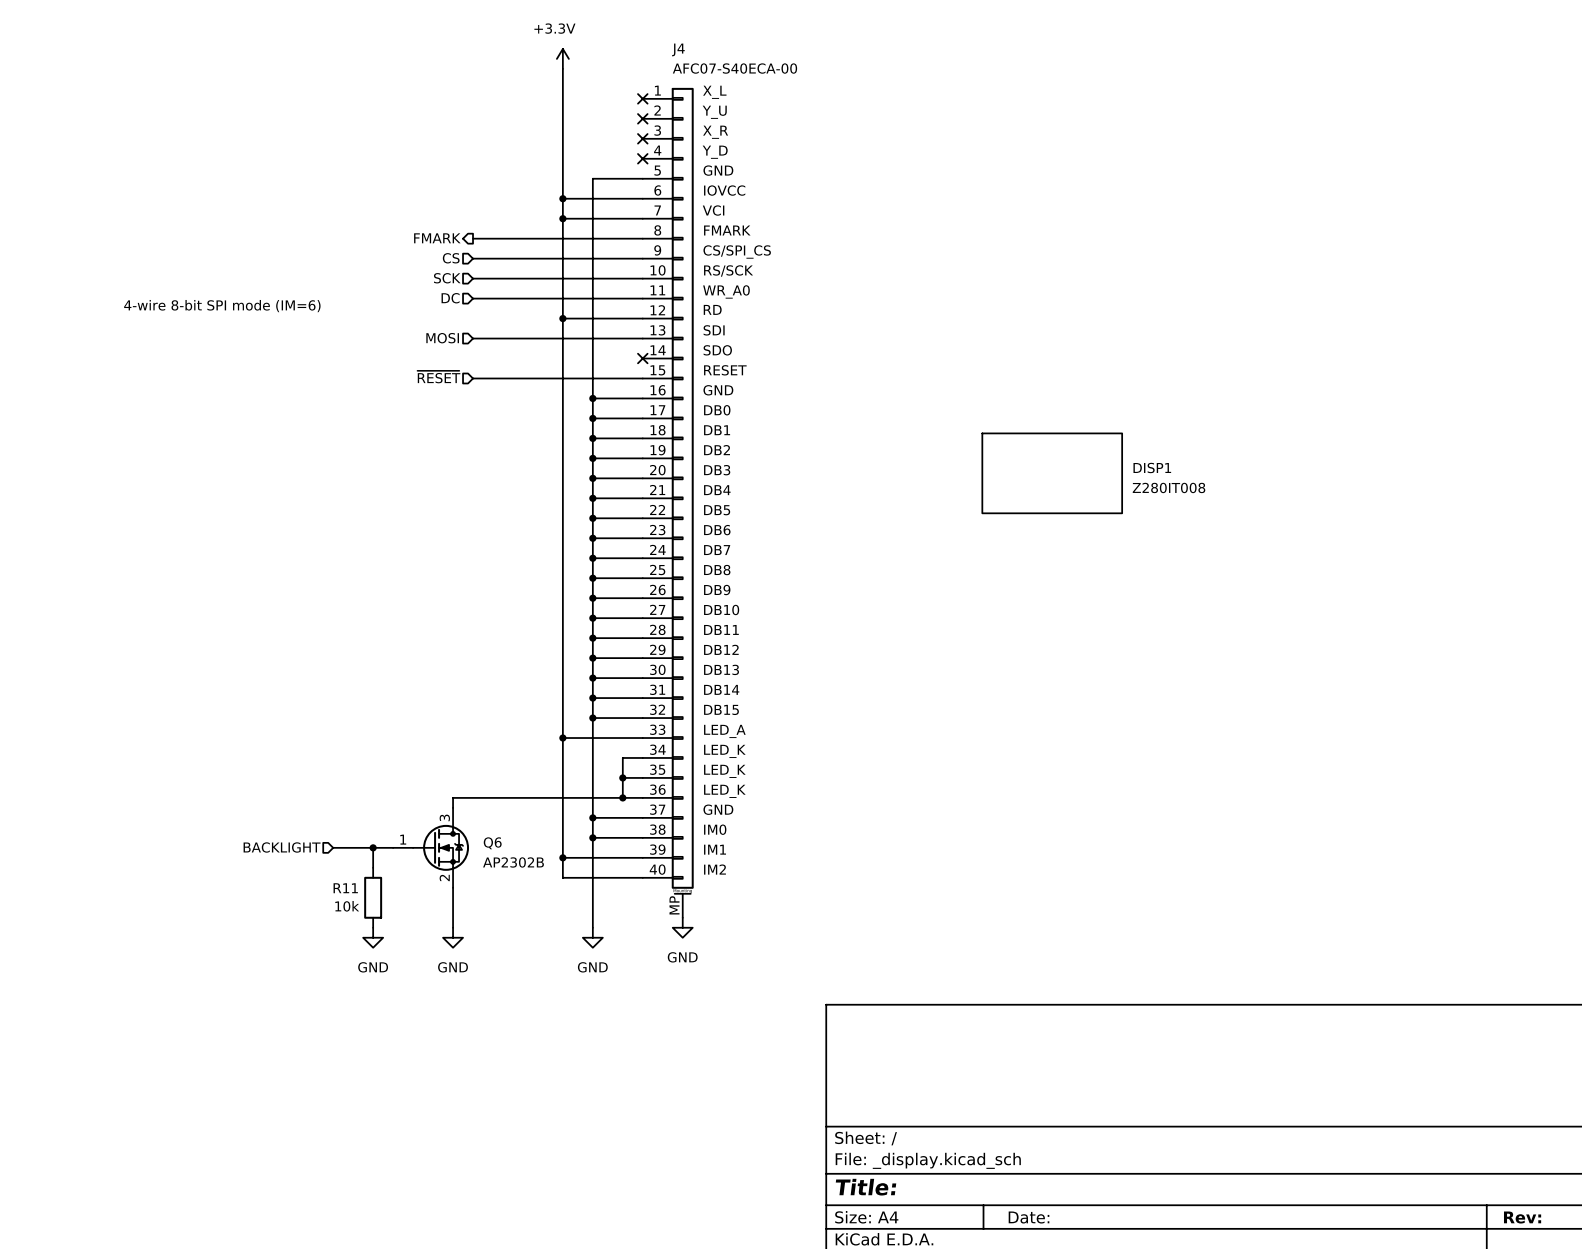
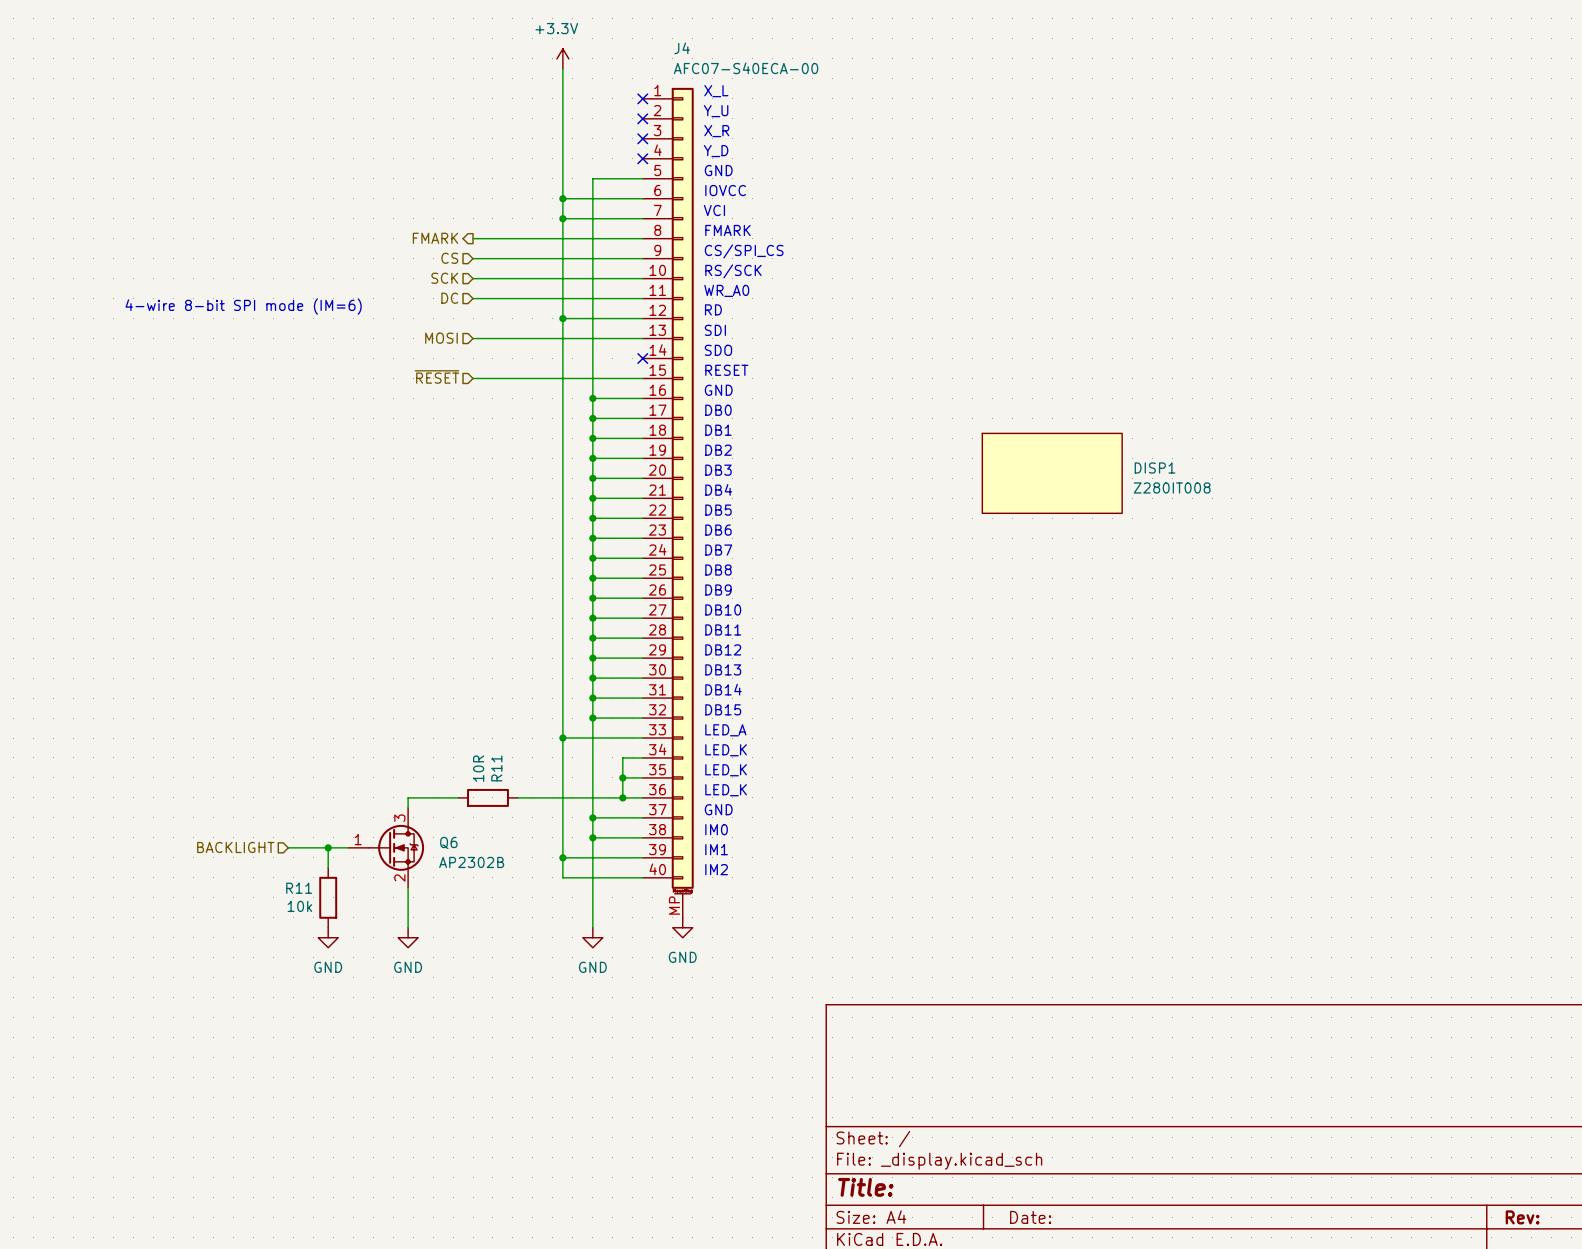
wire: (453, 797) (453, 807) -> (453, 797) (408, 797) (408, 807)
wire: (458, 797) (517, 797) -> none
R11: none -> 10R (487, 797)
hierarchical label position: BACKLIGHT (282, 847) -> BACKLIGHT (235, 847)
wire: (373, 847) (373, 867) -> (328, 847) (328, 867)
junction position: (373, 847) -> (328, 847)
Q6 position: (431, 847) -> (386, 847)
wire: (453, 887) (453, 927) -> (408, 887) (408, 927)
R11 position: (373, 897) -> (328, 897)
power symbol: none -> GND (328, 937)
power symbol: GND (373, 937) -> none
power symbol: none -> GND (408, 937)
power symbol: GND (453, 937) -> none

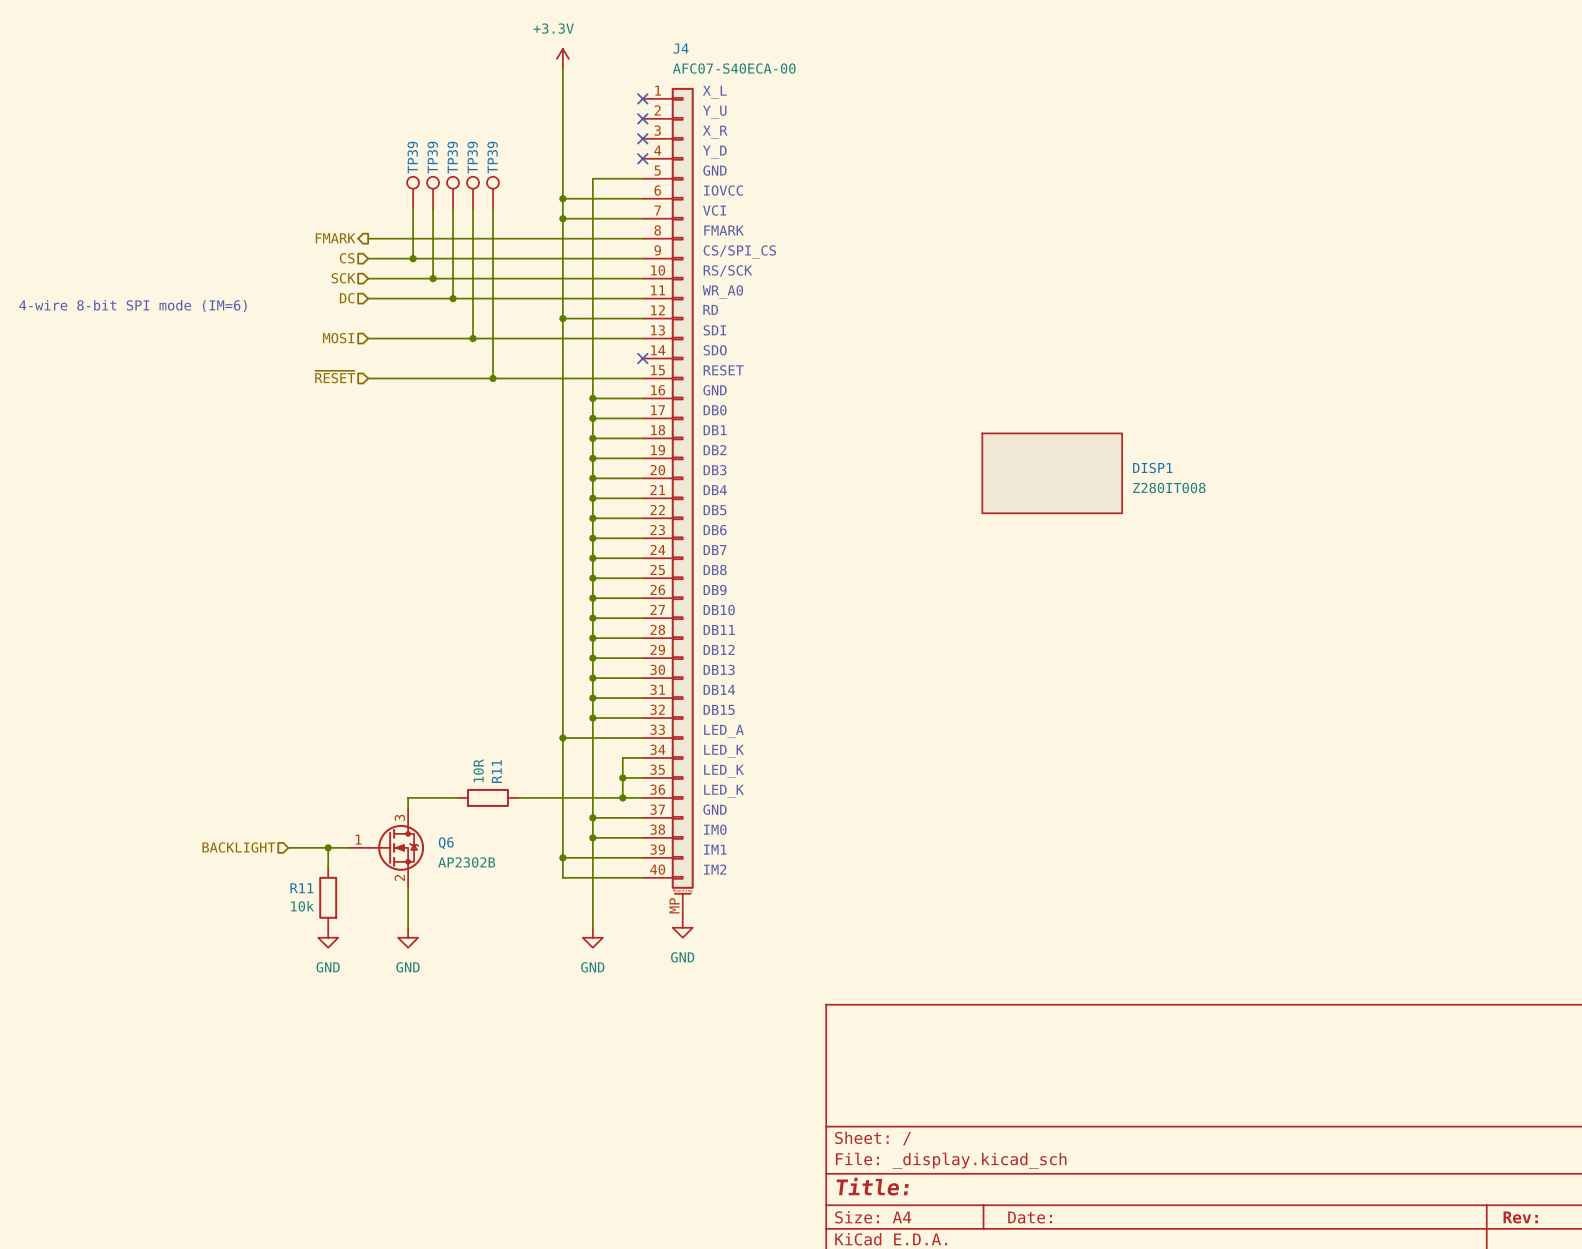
TP39: none -> (413, 192)
TP39: none -> (433, 192)
TP39: none -> (453, 192)
TP39: none -> (473, 192)
TP39: none -> (492, 192)
wire: none -> (413, 208) (413, 258)
wire: none -> (433, 208) (433, 278)
wire: none -> (453, 208) (453, 298)
wire: none -> (473, 208) (473, 338) (368, 338)
wire: none -> (492, 208) (492, 378)
wire: none -> (368, 238) (473, 238)
hierarchical label position: FMARK (435, 238) -> FMARK (335, 238)
wire: none -> (368, 258) (473, 258)
junction: none -> (413, 258)
hierarchical label position: CS (449, 258) -> CS (347, 258)
wire: none -> (368, 278) (473, 278)
junction: none -> (433, 278)
hierarchical label position: SCK (444, 278) -> SCK (343, 278)
wire: none -> (368, 298) (473, 298)
hierarchical label position: DC (449, 298) -> DC (347, 298)
junction: none -> (453, 298)
text position: 4-wire 8-bit SPI mode (IM=6) (243, 306) -> 4-wire 8-bit SPI mode (IM=6) (132, 306)
hierarchical label position: MOSI (441, 338) -> MOSI (338, 338)
junction: none -> (473, 338)
hierarchical label position: ~{RESET} (436, 376) -> ~{RESET} (335, 377)
wire: none -> (368, 378) (473, 378)
junction: none -> (492, 378)

